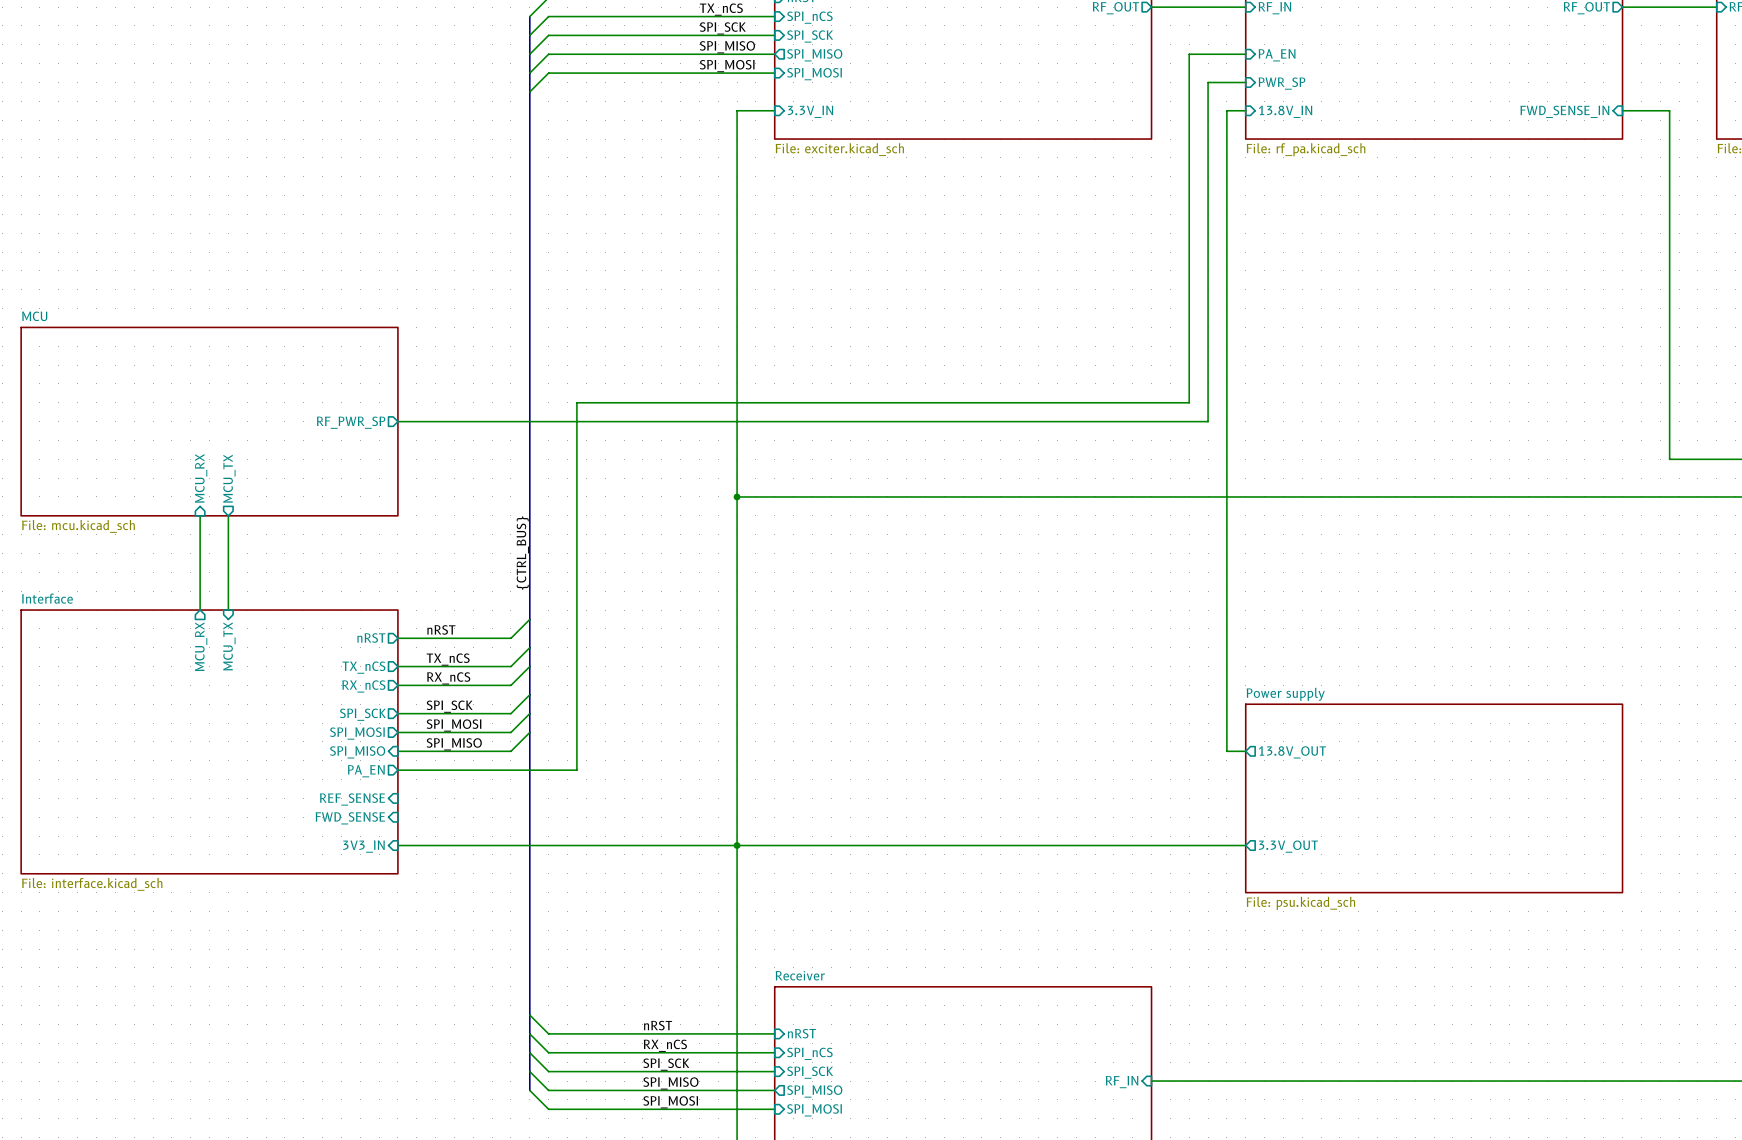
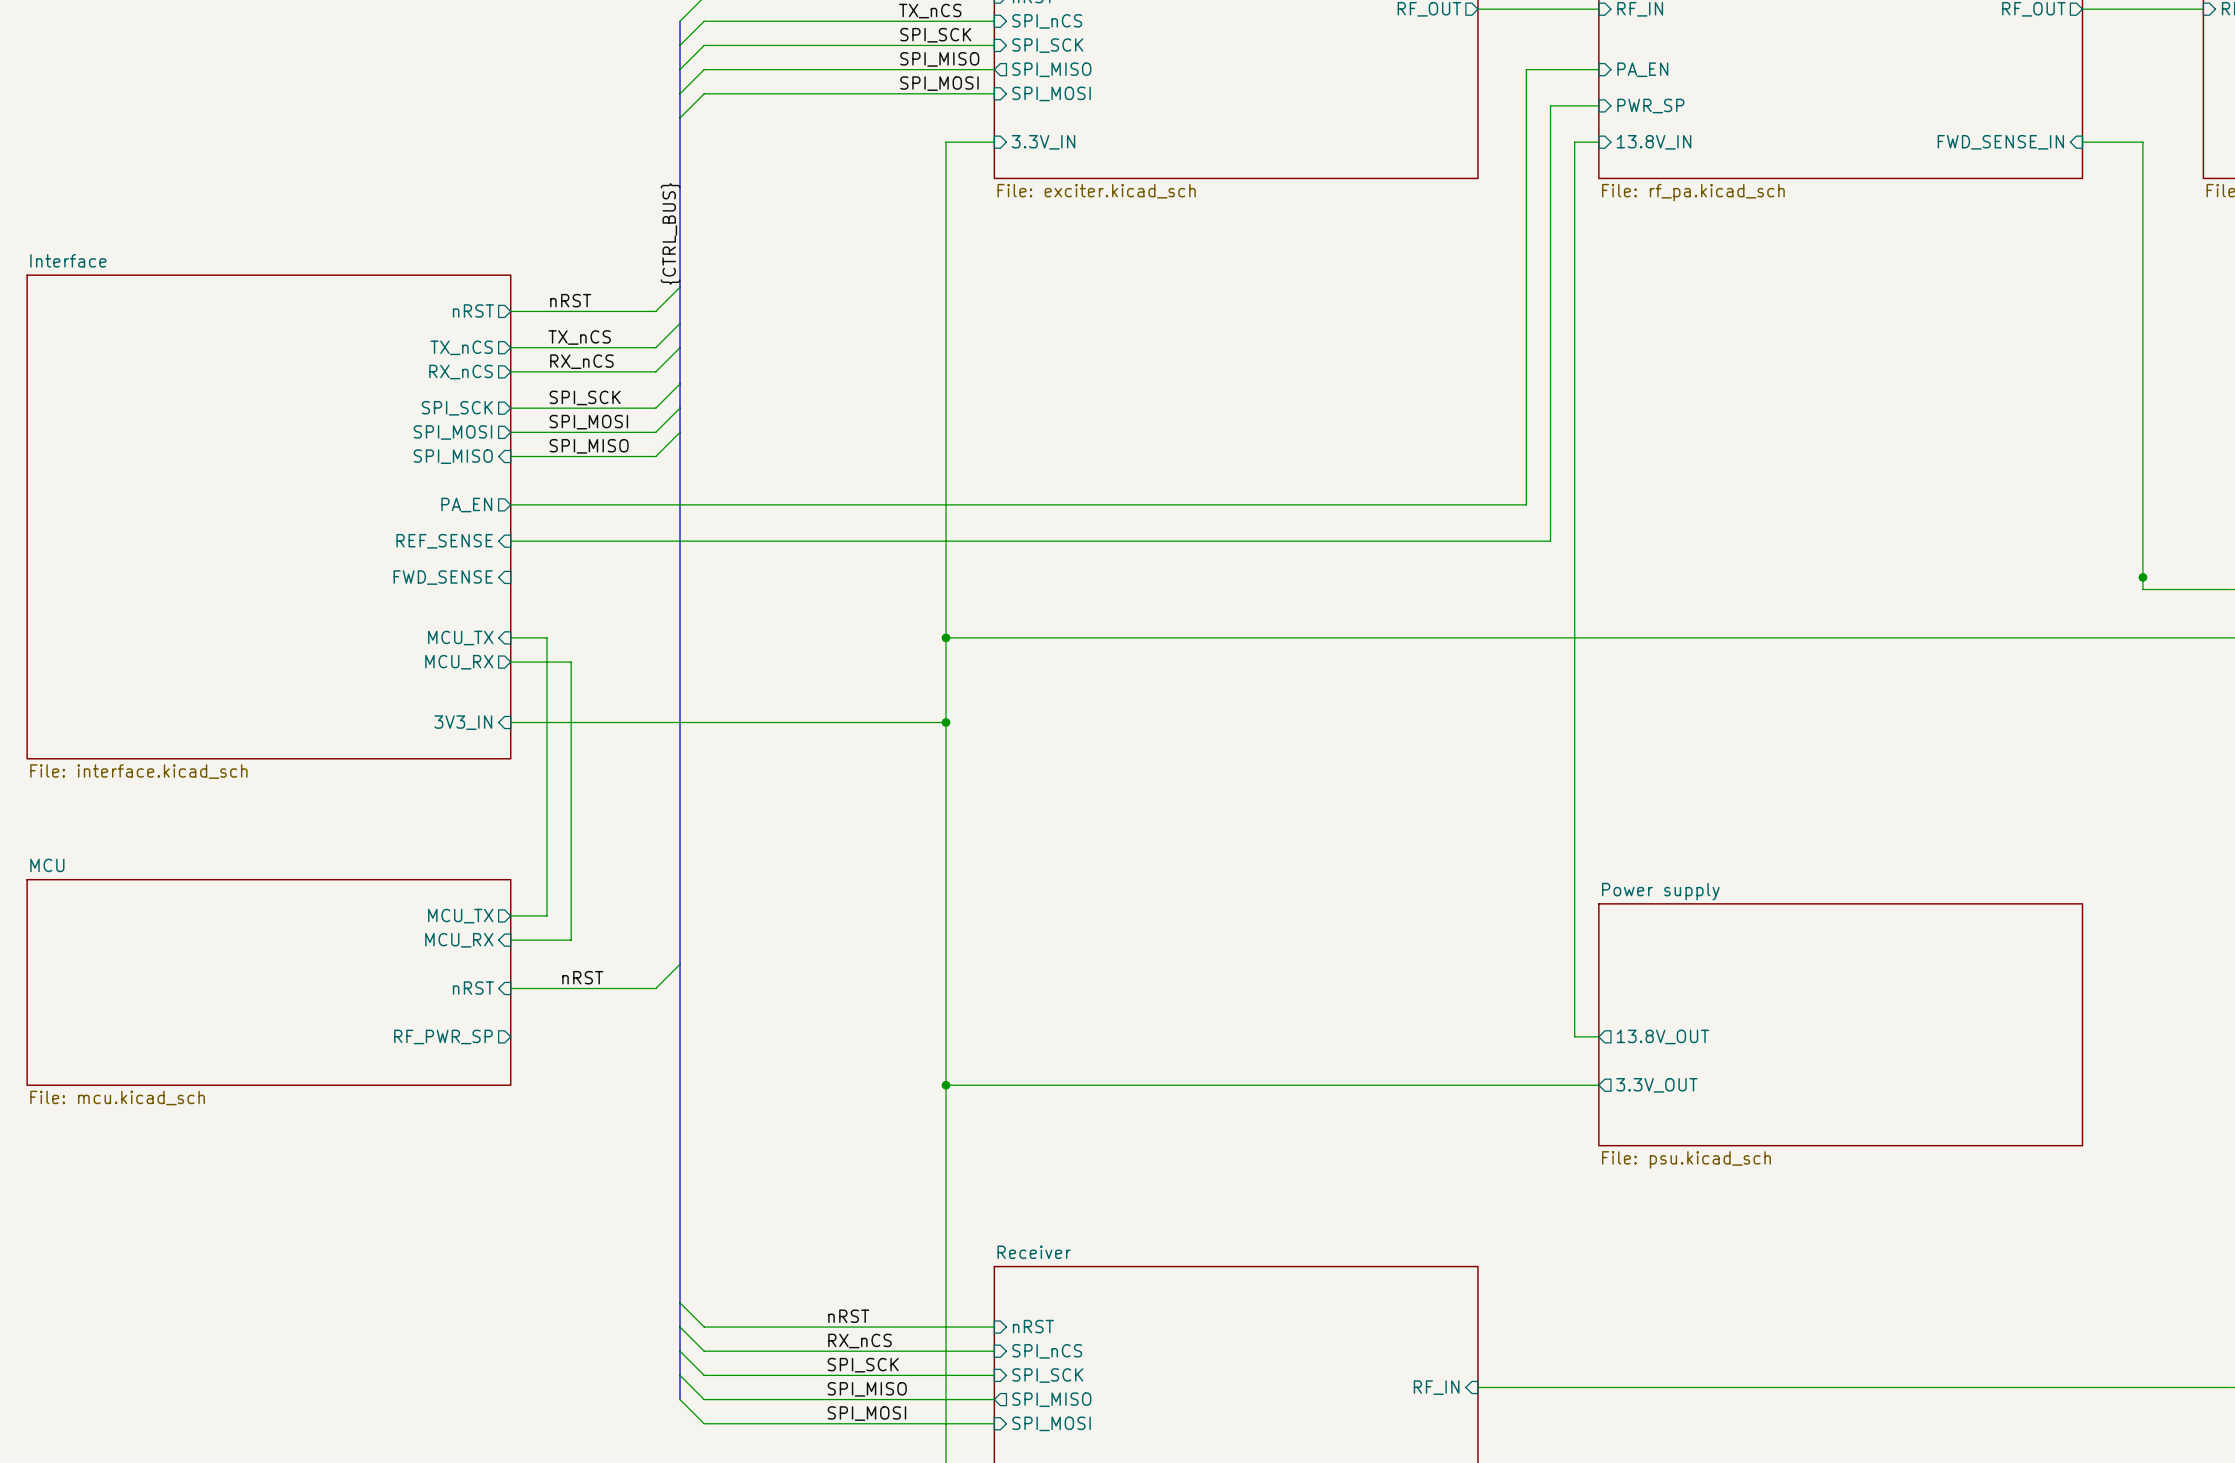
label: none -> {CTRL_BUS} (670, 233)
wire: none -> (680, 287) (655, 311) (510, 311)
label: none -> nRST (570, 300)
sheet pin: none -> nRST (473, 310)
wire: none -> (680, 323) (655, 347) (510, 347)
label: none -> TX_nCS (579, 337)
wire: none -> (680, 347) (655, 371) (510, 371)
sheet pin: none -> TX_nCS (461, 347)
label: none -> RX_nCS (581, 361)
sheet pin: none -> RX_nCS (461, 372)
wire: none -> (680, 383) (655, 408) (510, 408)
label: none -> SPI_SCK (585, 397)
wire: none -> (680, 408) (655, 432) (510, 432)
sheet pin: none -> SPI_SCK (457, 408)
label: none -> SPI_MOSI (588, 422)
wire: none -> (680, 432) (655, 456) (510, 456)
sheet pin: none -> SPI_MOSI (452, 432)
label: none -> SPI_MISO (589, 446)
sheet pin: none -> SPI_MISO (453, 456)
wire: (1189, 393) (1189, 402) (576, 402) (576, 770) (510, 770) -> (1526, 504) (510, 504)
sheet pin: none -> PA_EN (466, 505)
sheet Interface: none -> File: interface.kicad_sch (268, 516)
sheet MCU: File: mcu.kicad_sch (209, 421) -> none
sheet pin shape: output (351, 422) -> input (444, 541)
sheet pin: RF_PWR_SP (351, 422) -> REF_SENSE (444, 541)
junction: none -> (2142, 577)
sheet pin: none -> FWD_SENSE (443, 577)
sheet pin: MCU_RX (201, 478) -> none
sheet pin: MCU_TX (229, 478) -> none
sheet pin: none -> MCU_TX (460, 638)
wire: (200, 515) (200, 610) -> none
wire: (228, 515) (228, 610) -> none
sheet pin: none -> MCU_RX (459, 662)
label: {CTRL_BUS} (522, 553) -> none
wire: none -> (510, 722) (945, 722)
junction: none -> (945, 722)
sheet pin: none -> 3V3_IN (463, 722)
wire: (529, 619) (510, 638) (397, 638) -> none
label position: nRST (441, 629) -> nRST (582, 977)
sheet pin: nRST (371, 637) -> none
sheet pin: MCU_RX (201, 646) -> none
sheet pin: MCU_TX (229, 646) -> none
wire: (529, 647) (510, 666) (397, 666) -> none
label: TX_nCS (448, 659) -> none
wire: (529, 666) (510, 685) (397, 685) -> none
sheet pin: TX_nCS (363, 667) -> none
label: RX_nCS (448, 678) -> none
sheet pin: RX_nCS (363, 686) -> none
wire: (529, 694) (510, 713) (426, 713) -> (510, 637) (547, 637) (547, 915)
label: SPI_SCK (449, 706) -> none
wire: (529, 713) (510, 732) (445, 732) -> (510, 662) (571, 662) (571, 940)
sheet pin: SPI_SCK (362, 714) -> MCU_TX (460, 916)
label: SPI_MOSI (454, 725) -> none
wire: (529, 732) (510, 751) (397, 751) -> none
sheet pin shape: output (357, 733) -> input (459, 940)
sheet pin: SPI_MOSI (357, 733) -> MCU_RX (459, 940)
sheet Interface: File: interface.kicad_sch (209, 741) -> none
label: SPI_MISO (454, 744) -> none
wire: none -> (680, 964) (655, 988)
wire: (1226, 751) (1245, 751) -> (1574, 964) (1574, 1036) (1598, 1036)
sheet pin: SPI_MISO (357, 752) -> none
sheet pin position: 13.8V_OUT (1292, 752) -> 13.8V_OUT (1662, 1036)
sheet MCU: none -> File: mcu.kicad_sch (268, 982)
sheet pin shape: output (366, 771) -> input (473, 988)
sheet pin: PA_EN (366, 771) -> nRST (473, 988)
sheet pin: REF_SENSE (352, 799) -> none
sheet pin: none -> RF_PWR_SP (443, 1036)
sheet pin: FWD_SENSE (350, 818) -> none
wire: (397, 845) (737, 845) -> none
sheet pin: 3V3_IN (363, 846) -> none

